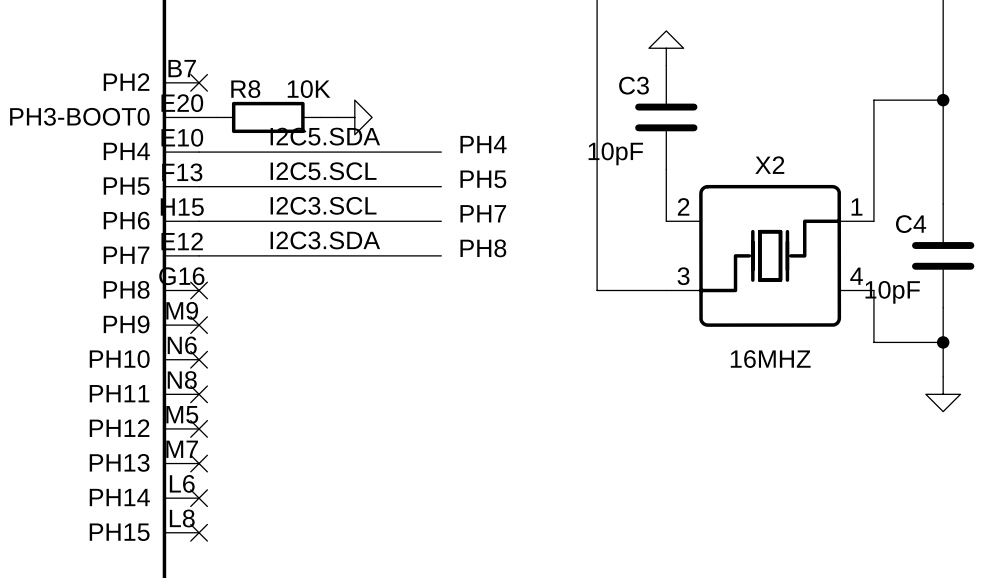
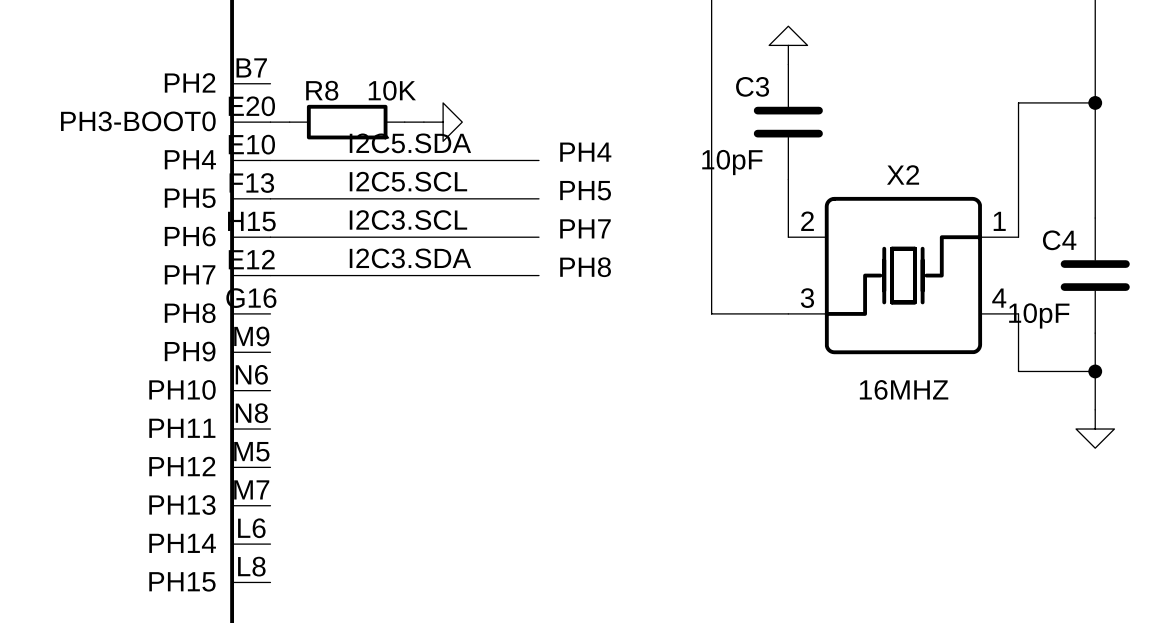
no-connect mark: (199, 82) -> none
no-connect mark: (199, 290) -> none
no-connect mark: (199, 325) -> none
no-connect mark: (199, 359) -> none
no-connect mark: (199, 394) -> none
no-connect mark: (199, 428) -> none
no-connect mark: (199, 463) -> none
no-connect mark: (199, 498) -> none
no-connect mark: (199, 532) -> none

